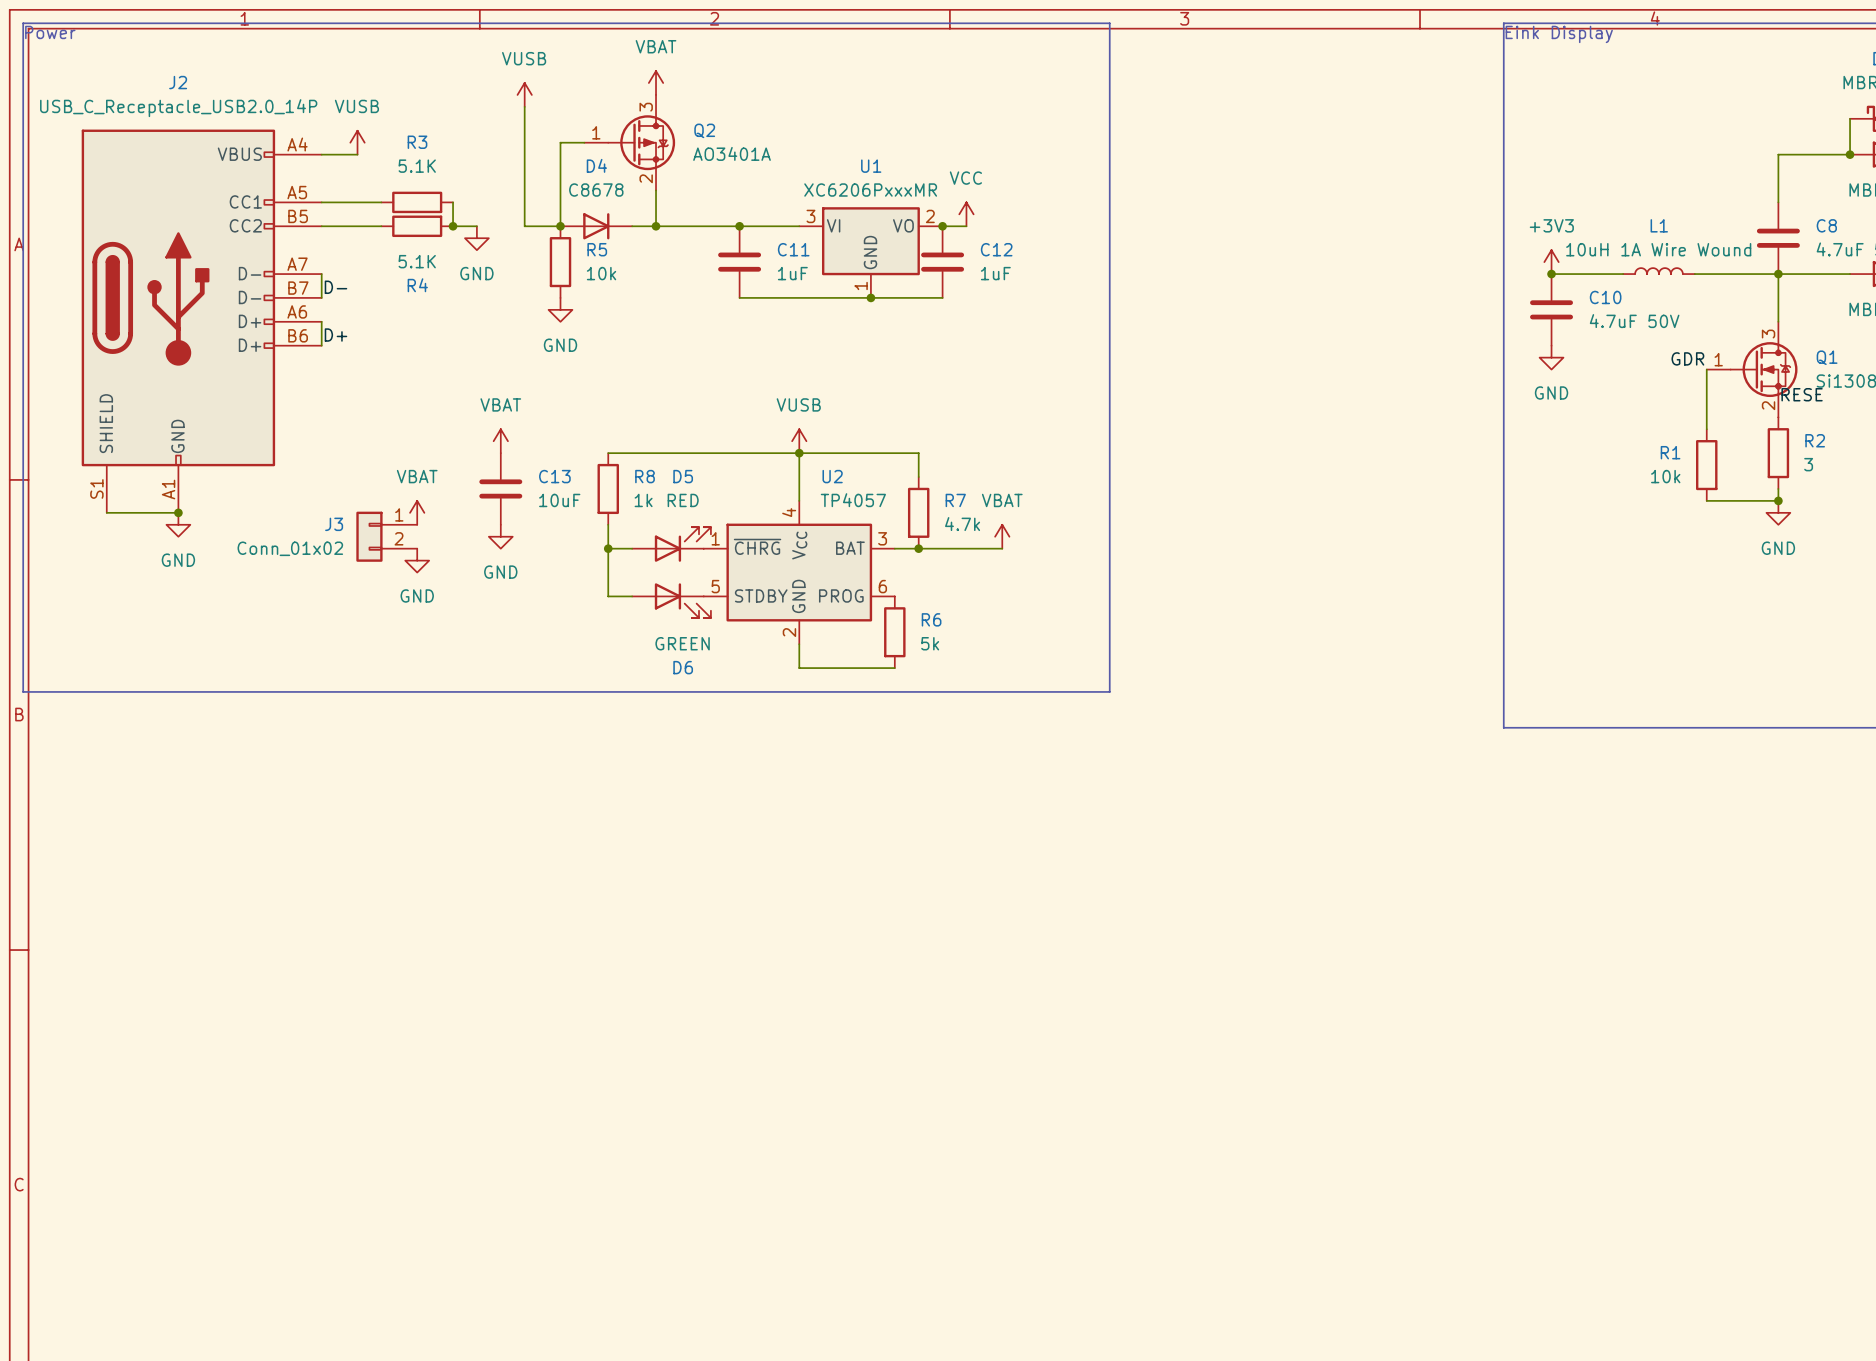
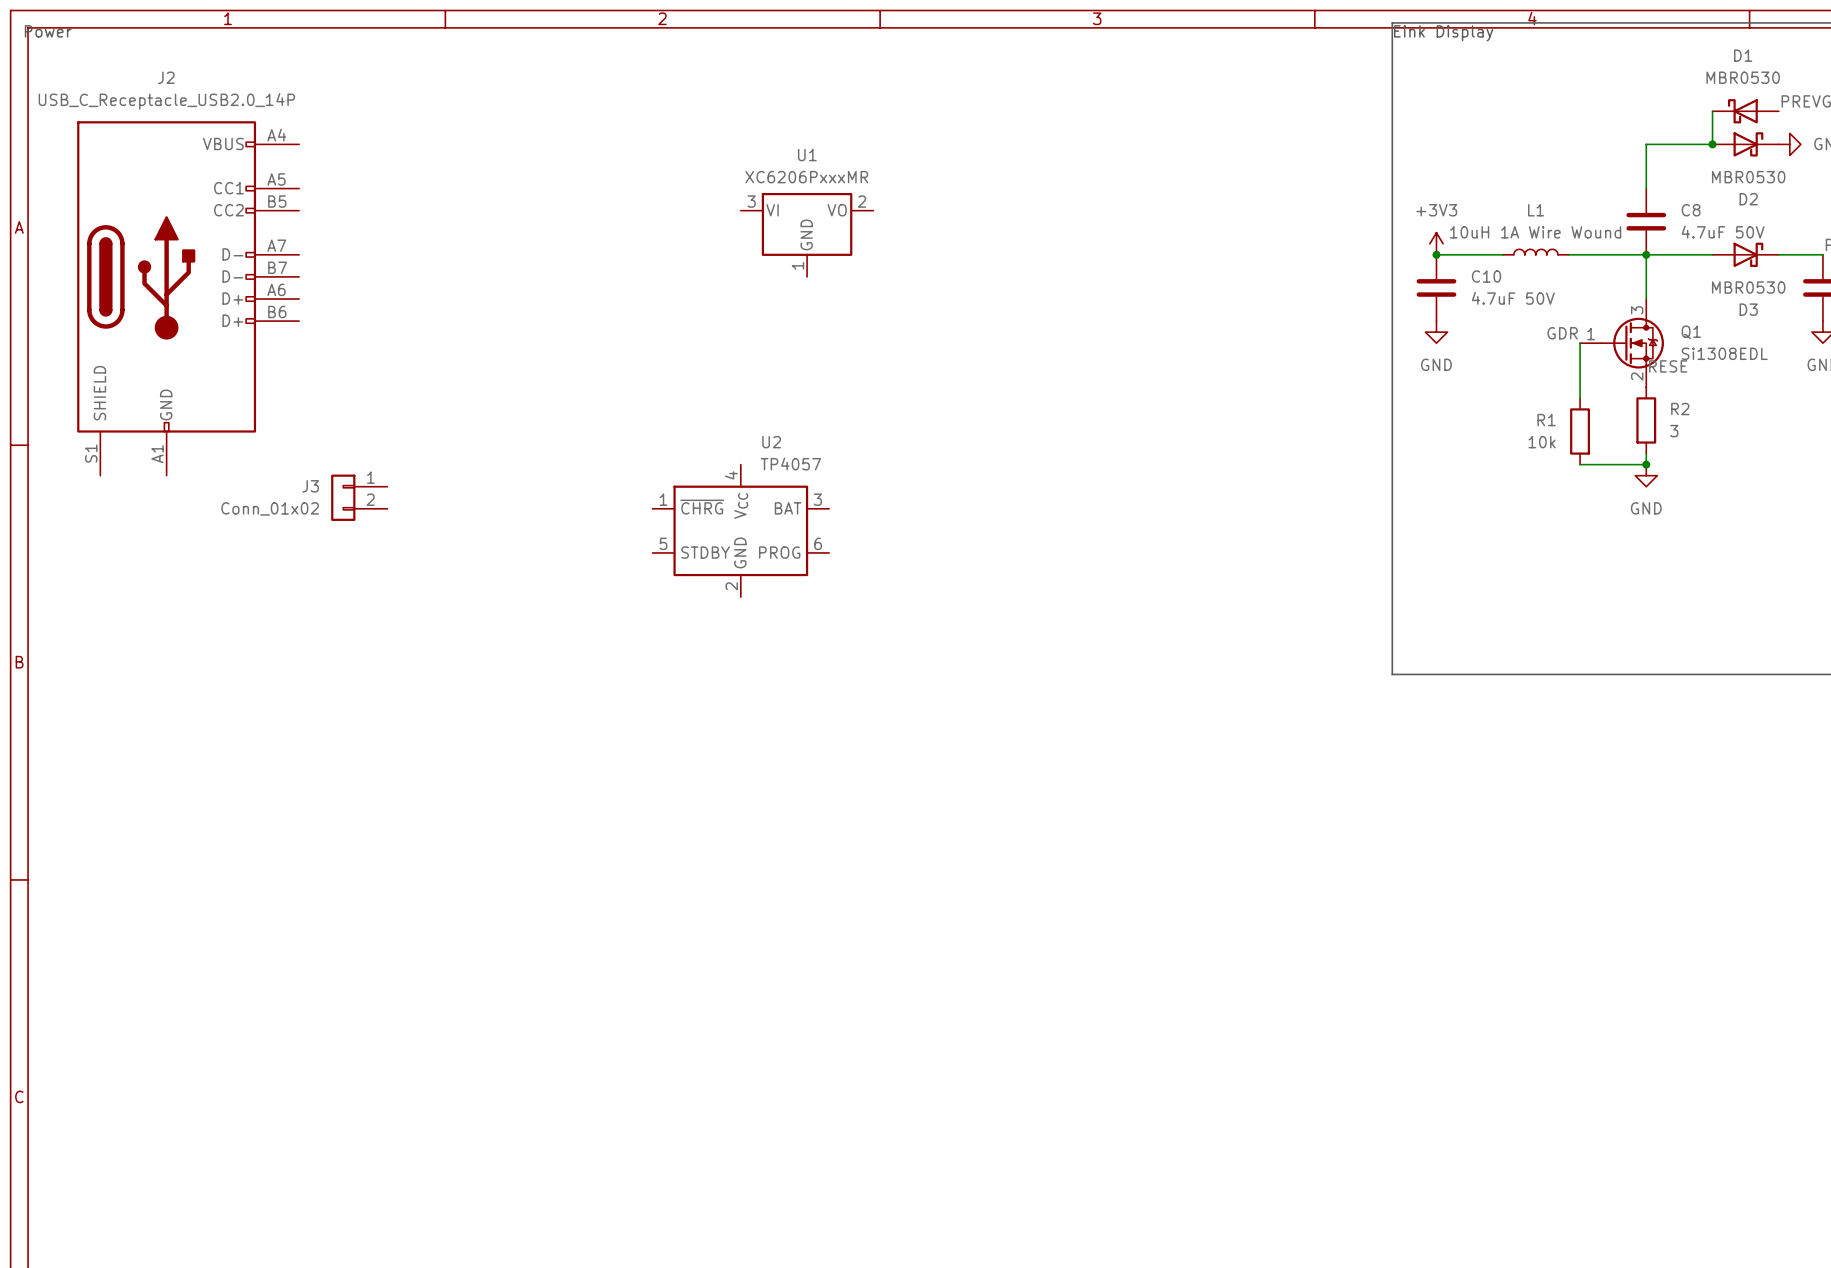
line: (23, 23) (1109, 23) (1109, 691) (23, 691) (23, 23) -> none
power symbol: VBAT (656, 83) -> none
power symbol: VUSB (524, 94) -> none
wire: (524, 106) (524, 226) (560, 226) (560, 142) (584, 142) -> none
power symbol: VUSB (357, 142) -> none
Q2: AO3401A (629, 142) -> none
wire: (321, 154) (357, 154) -> none
wire: (656, 190) (656, 226) -> none
wire: (321, 202) (381, 202) -> none
R3: 5.1K (417, 202) -> none
wire: (453, 202) (453, 226) (476, 226) -> none
power symbol: VCC (966, 214) -> none
wire: (321, 226) (381, 226) -> none
R4: 5.1K (417, 226) -> none
junction: (453, 226) -> none
junction: (560, 226) -> none
D4: C8678 (596, 226) -> none
wire: (632, 226) (799, 226) -> none
junction: (656, 226) -> none
junction: (739, 226) -> none
wire: (942, 226) (966, 226) -> none
junction: (942, 226) -> none
power symbol: GND (476, 238) -> none
R5: 10k (560, 262) -> none
C11: 1uF (739, 262) -> none
C12: 1uF (942, 262) -> none
wire: (321, 274) (321, 297) -> none
label: D- (335, 287) -> none
wire: (739, 297) (942, 297) -> none
junction: (870, 297) -> none
power symbol: GND (560, 309) -> none
wire: (321, 321) (321, 345) -> none
label: D+ (335, 335) -> none
power symbol: VBAT (500, 441) -> none
power symbol: VUSB (799, 441) -> none
wire: (608, 453) (918, 453) (918, 477) -> none
wire: (799, 453) (799, 500) -> none
junction: (799, 453) -> none
C13: 10uF (500, 488) -> none
R8: 1k (608, 488) -> none
wire: (106, 512) (178, 512) -> none
junction: (178, 512) -> none
power symbol: VBAT (417, 512) -> none
R7: 4.7k (918, 512) -> none
power symbol: GND (178, 524) -> none
wire: (608, 524) (608, 596) (632, 596) -> none
power symbol: GND (500, 536) -> none
power symbol: VBAT (1002, 536) -> none
D5: RED (671, 544) -> none
wire: (608, 548) (632, 548) -> none
junction: (608, 548) -> none
wire: (894, 548) (1002, 548) -> none
junction: (918, 548) -> none
power symbol: GND (417, 560) -> none
D6: GREEN (671, 600) -> none
R6: 5k (894, 632) -> none
wire: (799, 644) (799, 668) (894, 668) -> none

